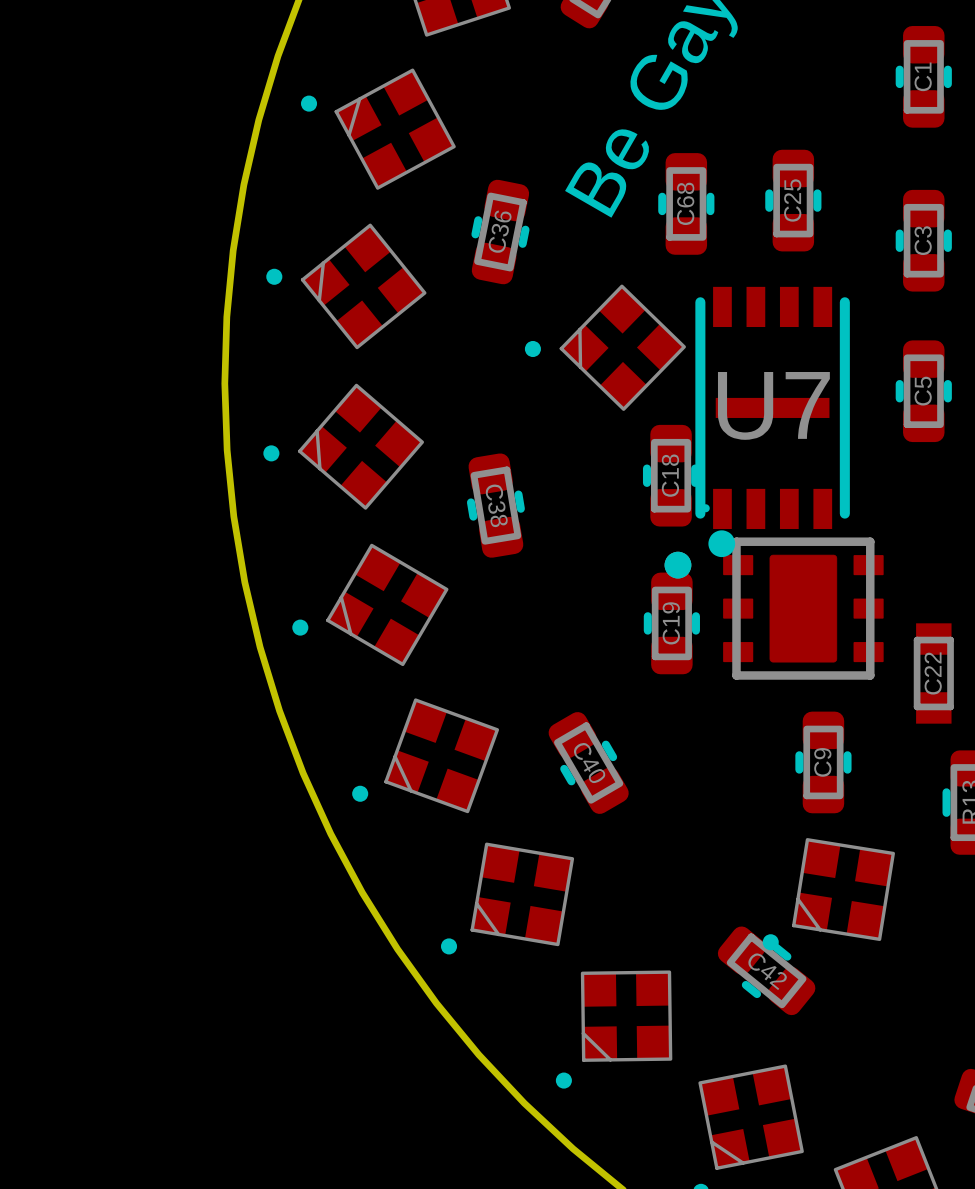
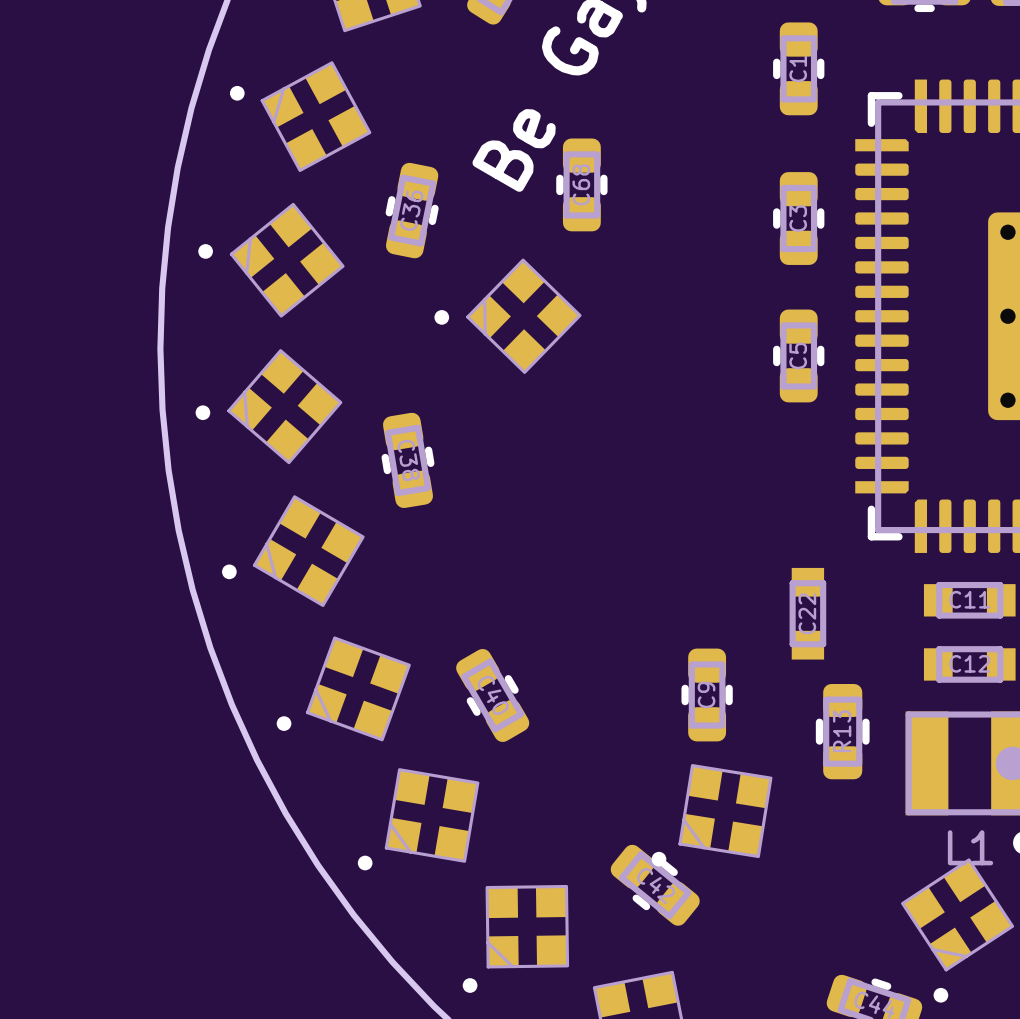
C25: (793, 200) -> none
U7: (772, 421) -> none
C18: (671, 475) -> none
part: (774, 608) -> none
C19: (671, 623) -> none

